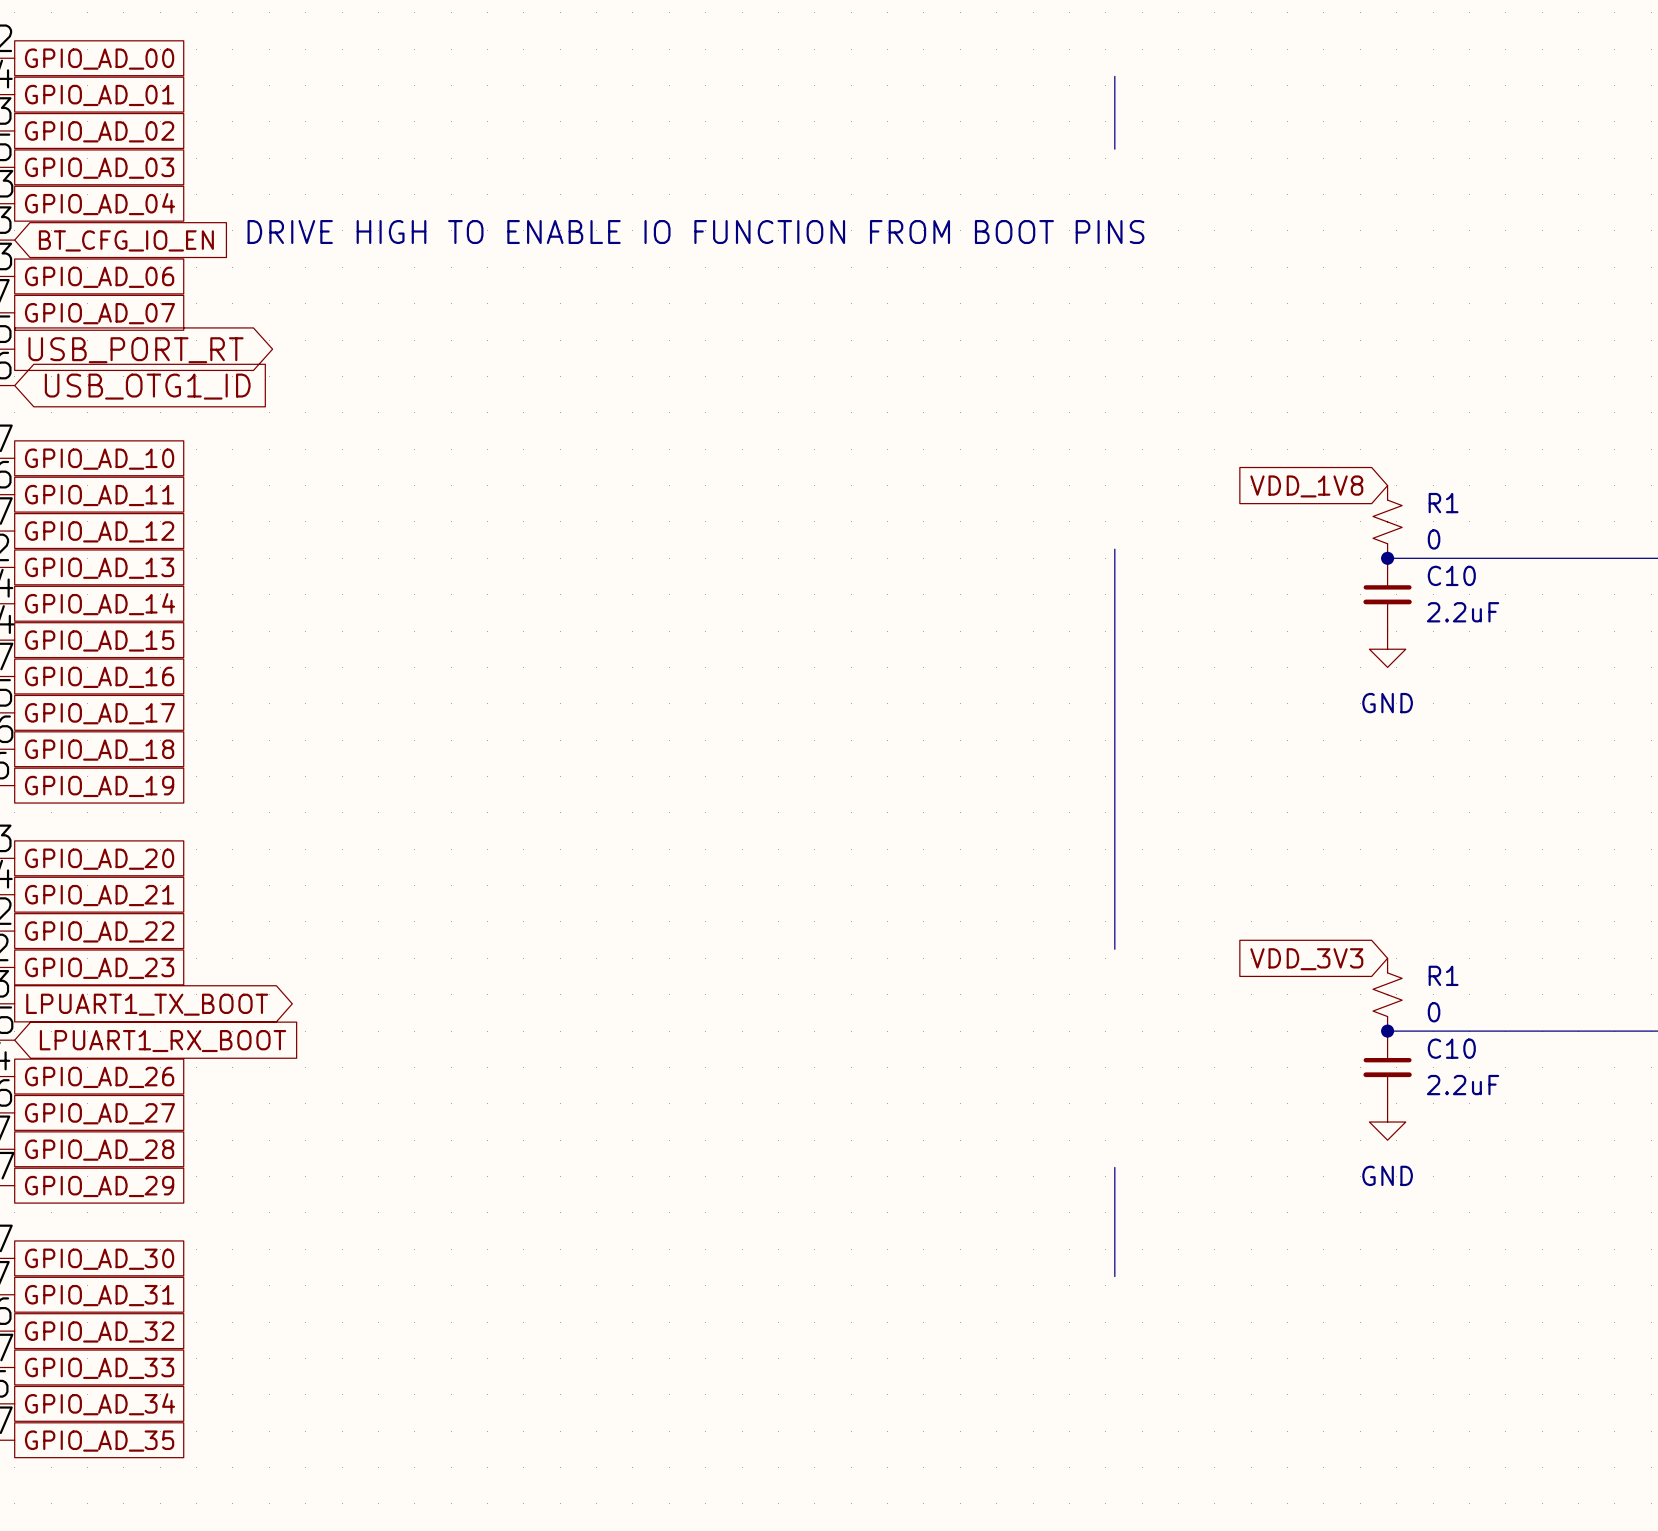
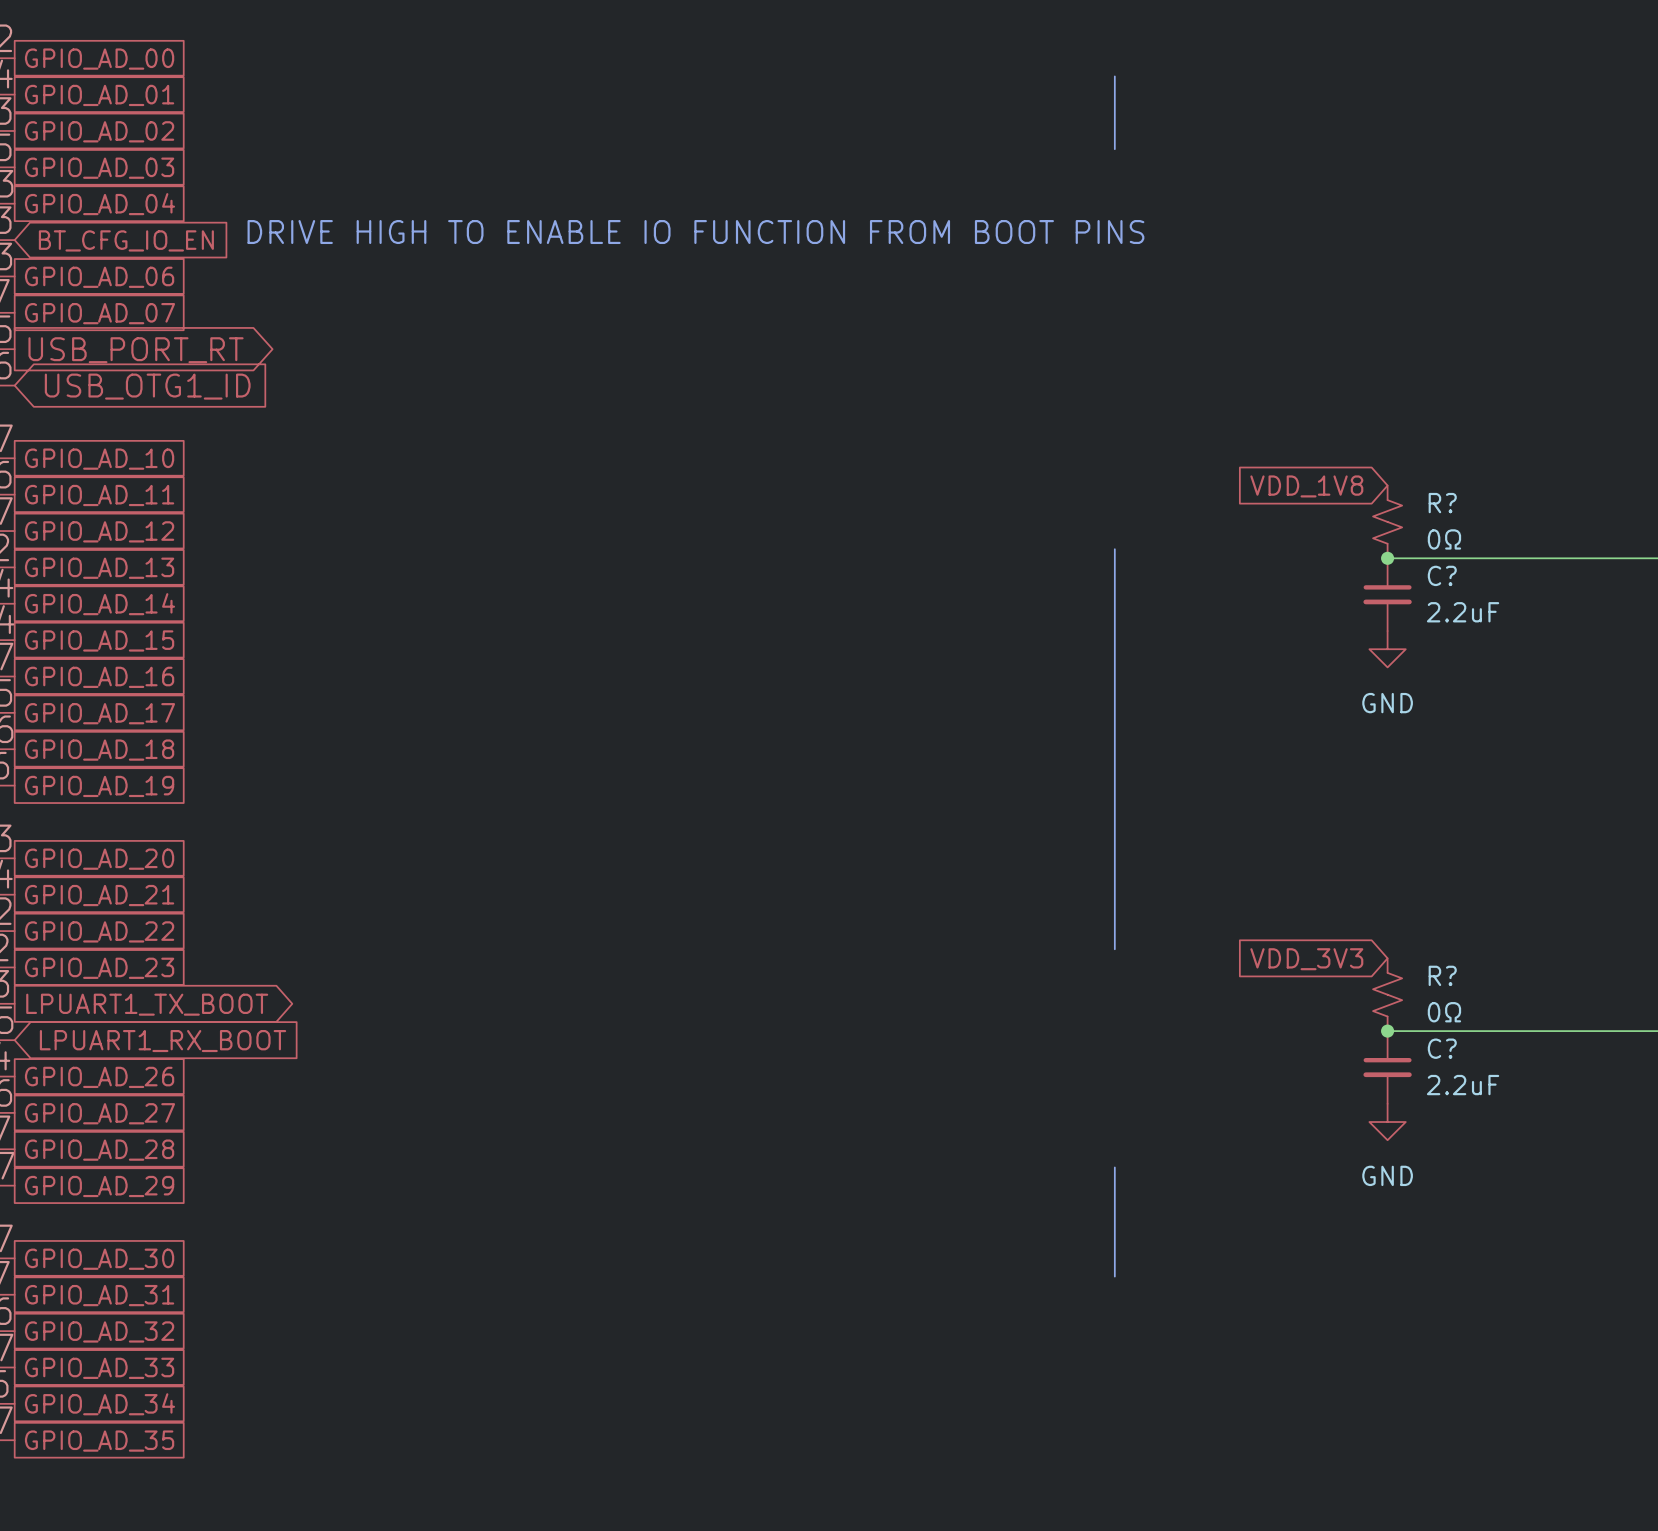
R1 name: R1 (1443, 503) -> R? (1442, 503)
R1 value: 0 (1434, 539) -> 0Ω (1444, 539)
C10 name: C10 (1451, 575) -> C? (1442, 575)
R1 name: R1 (1443, 975) -> R? (1442, 975)
R1 value: 0 (1434, 1012) -> 0Ω (1444, 1012)
C10 name: C10 (1451, 1048) -> C? (1442, 1048)

